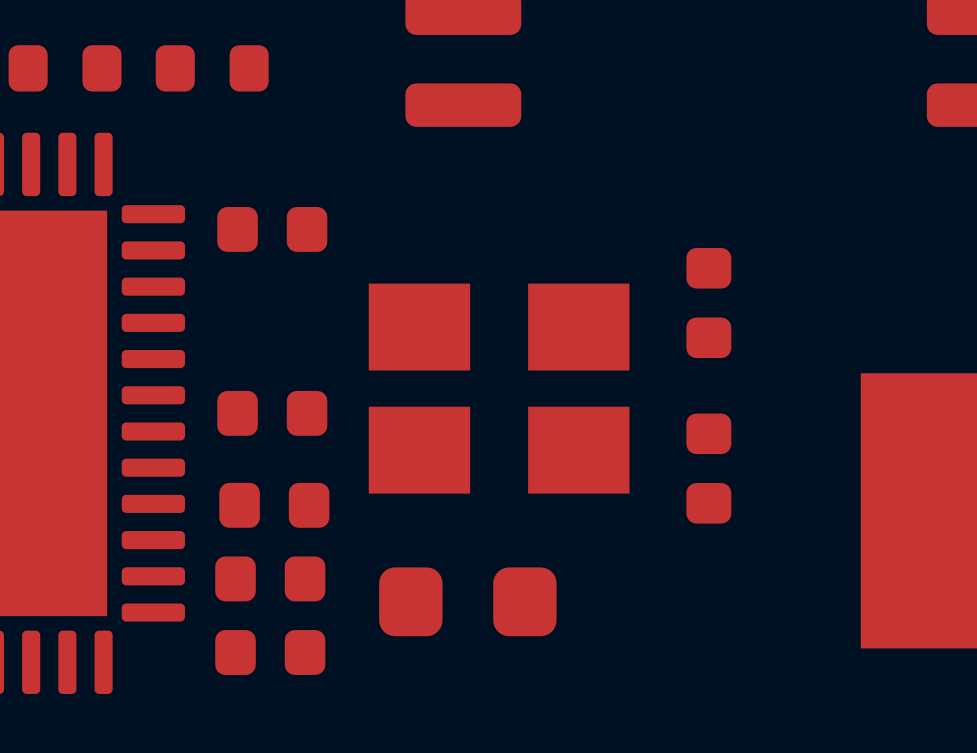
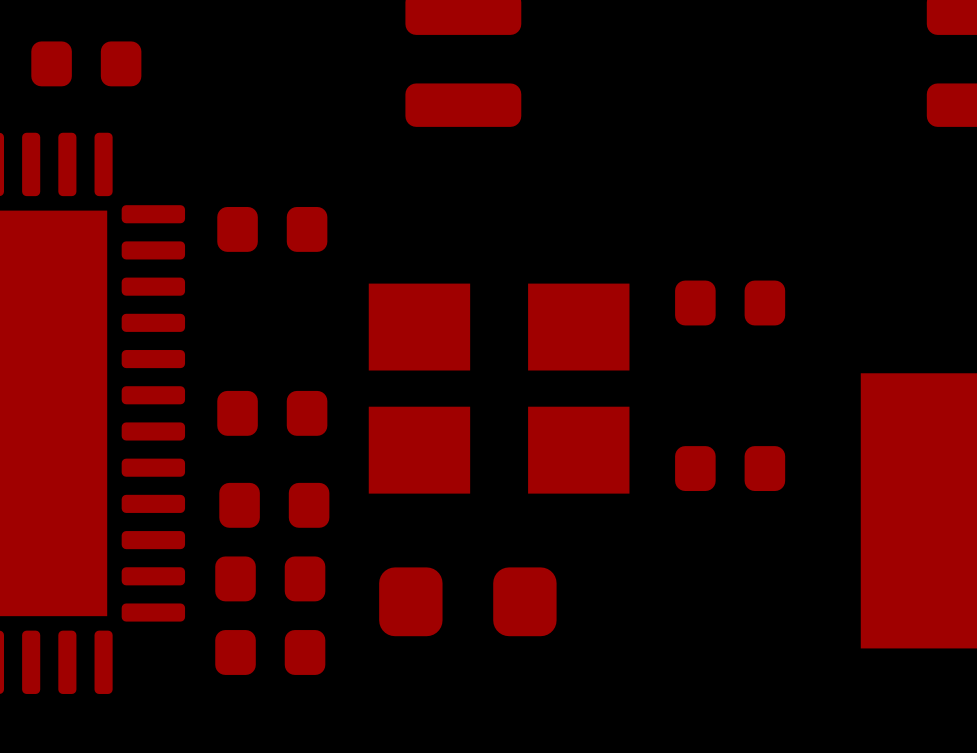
part footprint: [8, 45, 122, 92] -> [31, 41, 142, 87]
part: (212, 68) -> none
part rotation: 0° (708, 303) -> 90° clockwise (730, 303)
part rotation: 0° (708, 468) -> 90° clockwise (730, 468)

